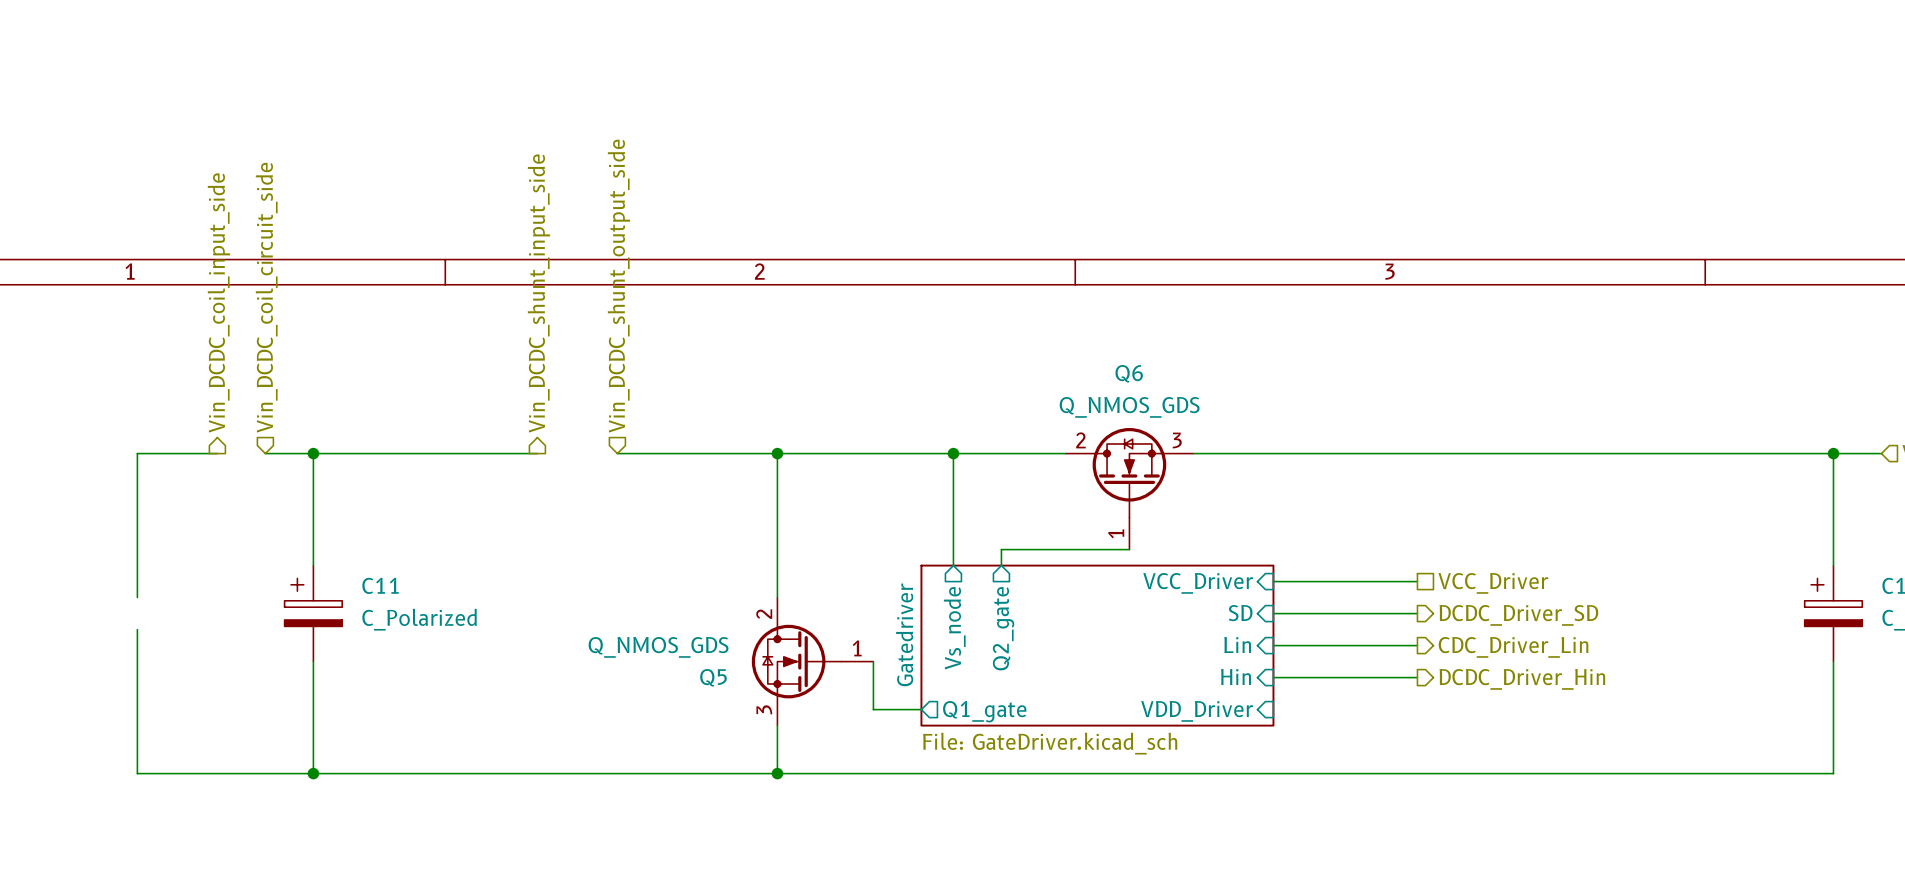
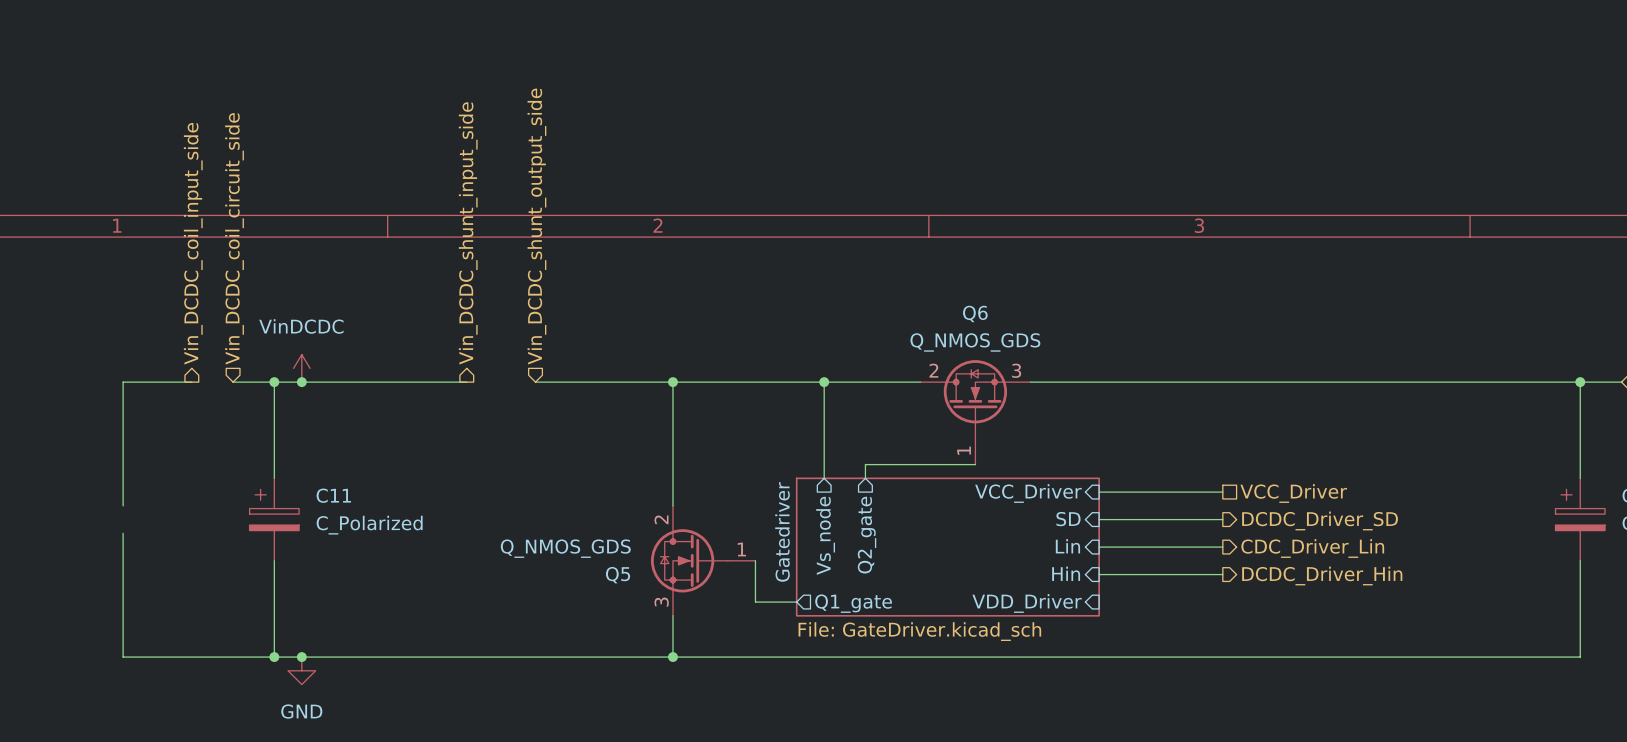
power symbol: none -> VinDCDC (301, 368)
junction: none -> (301, 382)
junction: none -> (301, 657)
power symbol: none -> GND (301, 670)

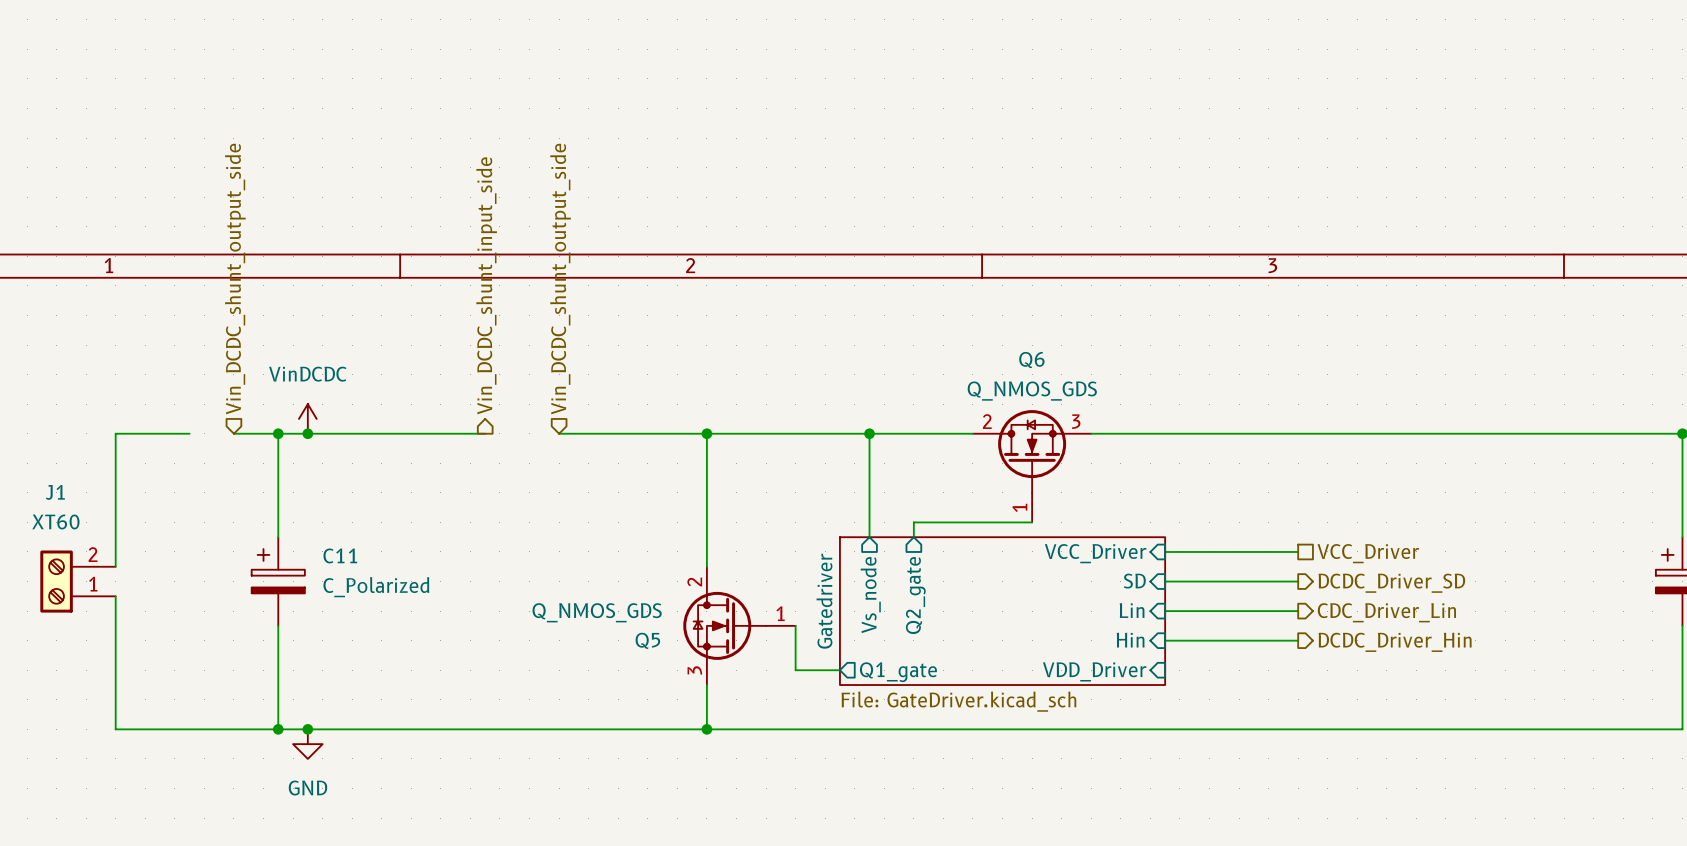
hierarchical label: Vin_DCDC_coil_circuit_side (234, 238) -> Vin_DCDC_shunt_output_side (235, 279)
hierarchical label: Vin_DCDC_coil_input_side (193, 243) -> none
J1: none -> XT60 (77, 581)

